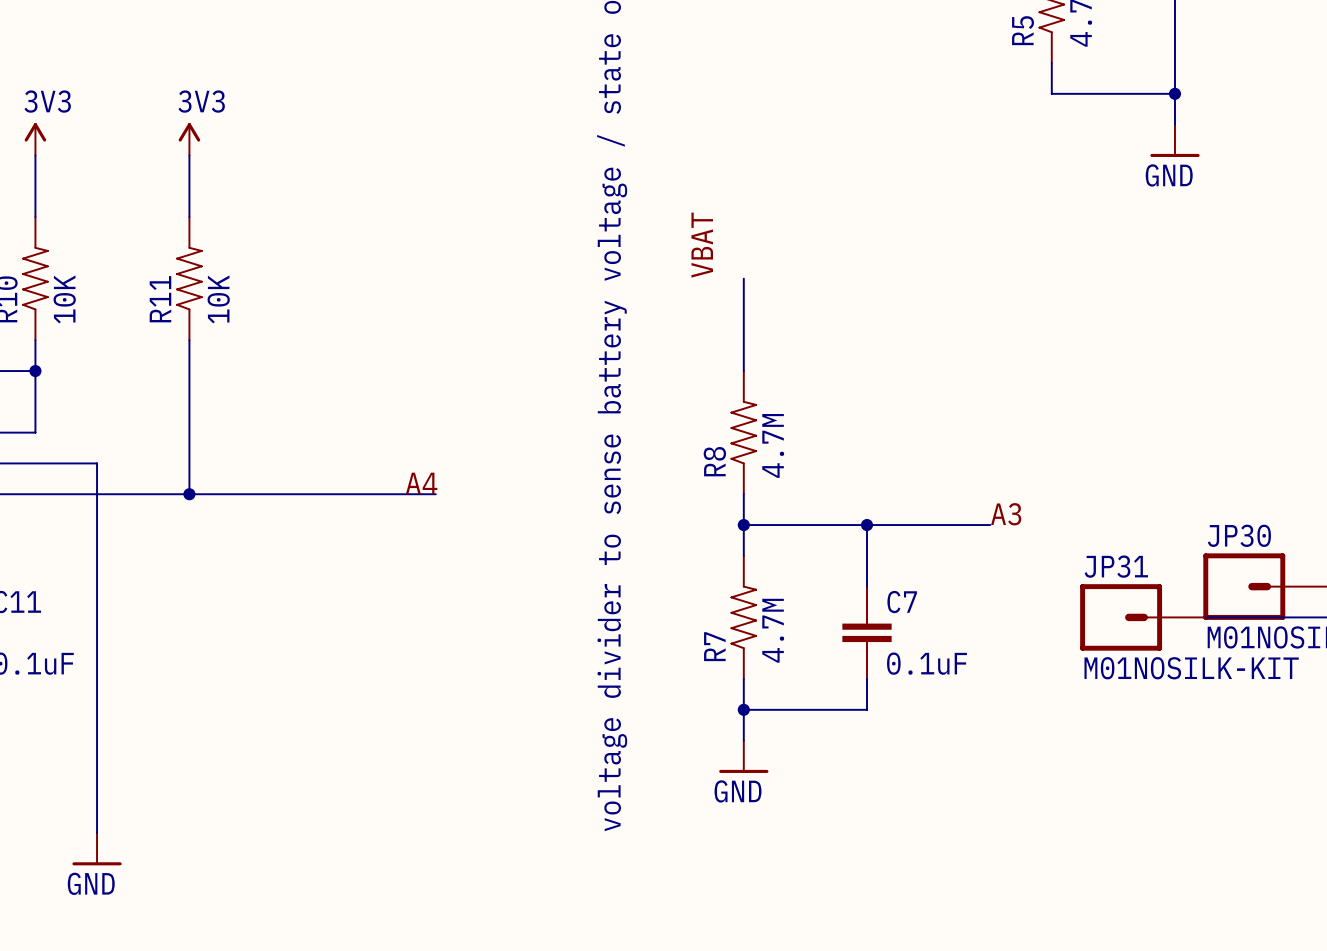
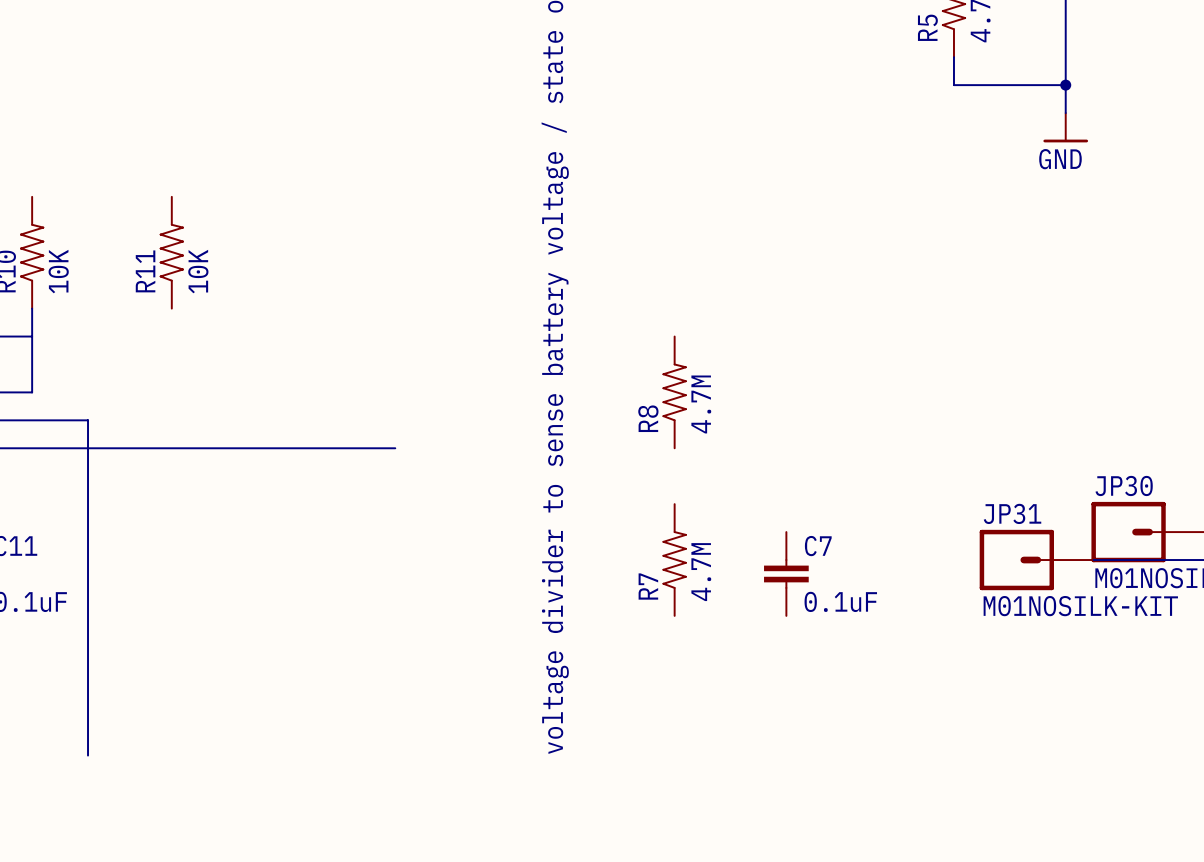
power symbol: 3V3 (35, 139) -> none
power symbol: 3V3 (189, 139) -> none
wire: (35, 155) (35, 217) -> none
wire: (189, 155) (189, 217) -> none
label: VBAT (702, 245) -> none
wire: (743, 278) (743, 371) -> none
wire: (189, 340) (189, 494) -> none
junction: (35, 371) -> none
label: A4 (421, 483) -> none
junction: (189, 494) -> none
wire: (743, 494) (743, 555) -> none
label: A3 (1006, 514) -> none
wire: (743, 525) (990, 525) -> none
junction: (743, 525) -> none
wire: (867, 525) (867, 586) -> none
junction: (867, 525) -> none
wire: (743, 679) (743, 740) -> none
wire: (867, 679) (867, 709) (743, 709) -> none
junction: (743, 709) -> none
power symbol: GND (743, 756) -> none
power symbol: GND (97, 849) -> none

